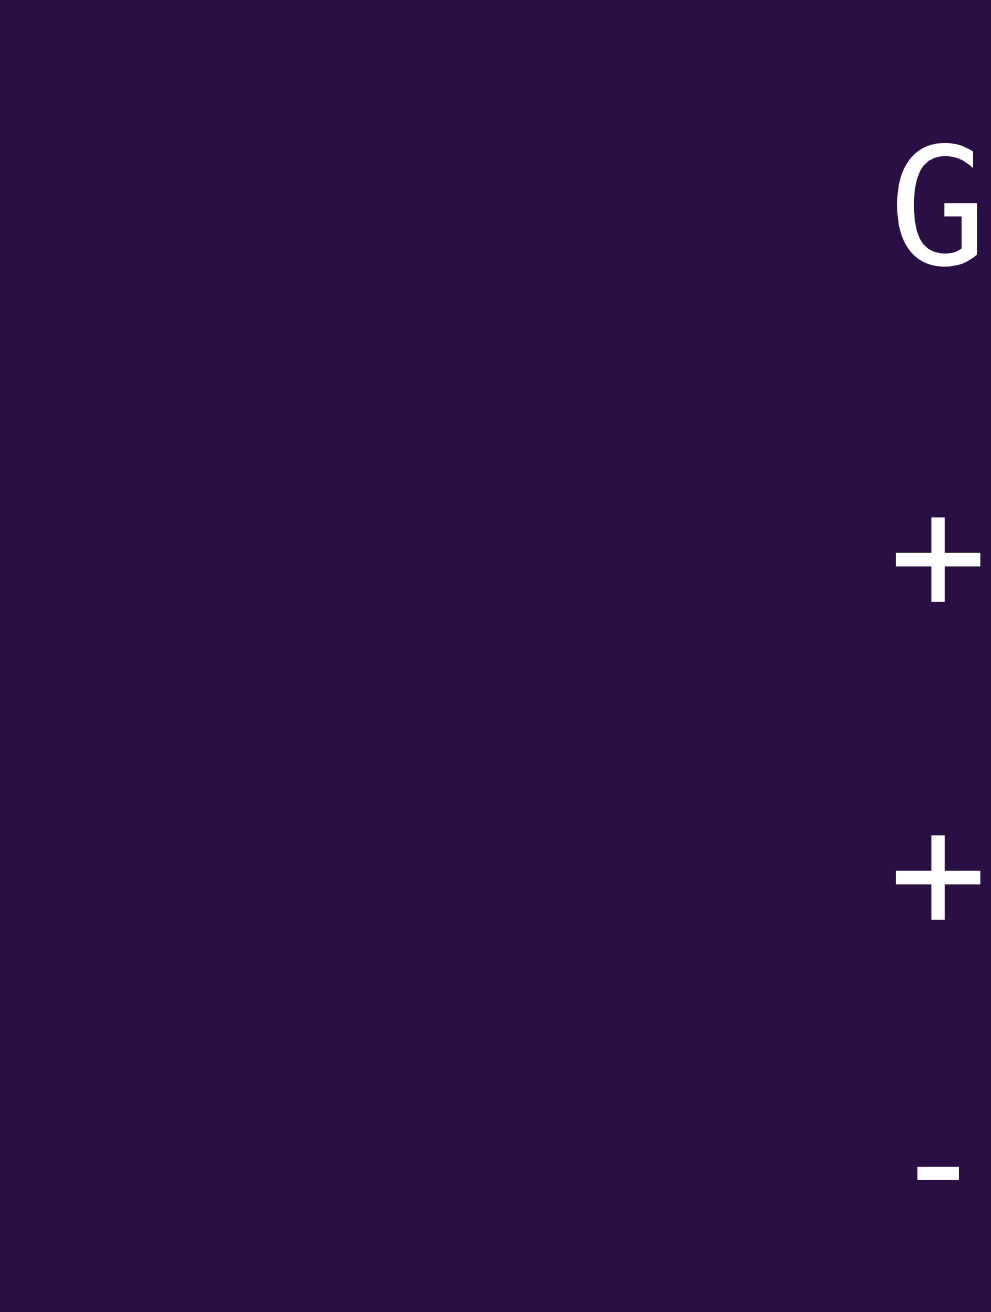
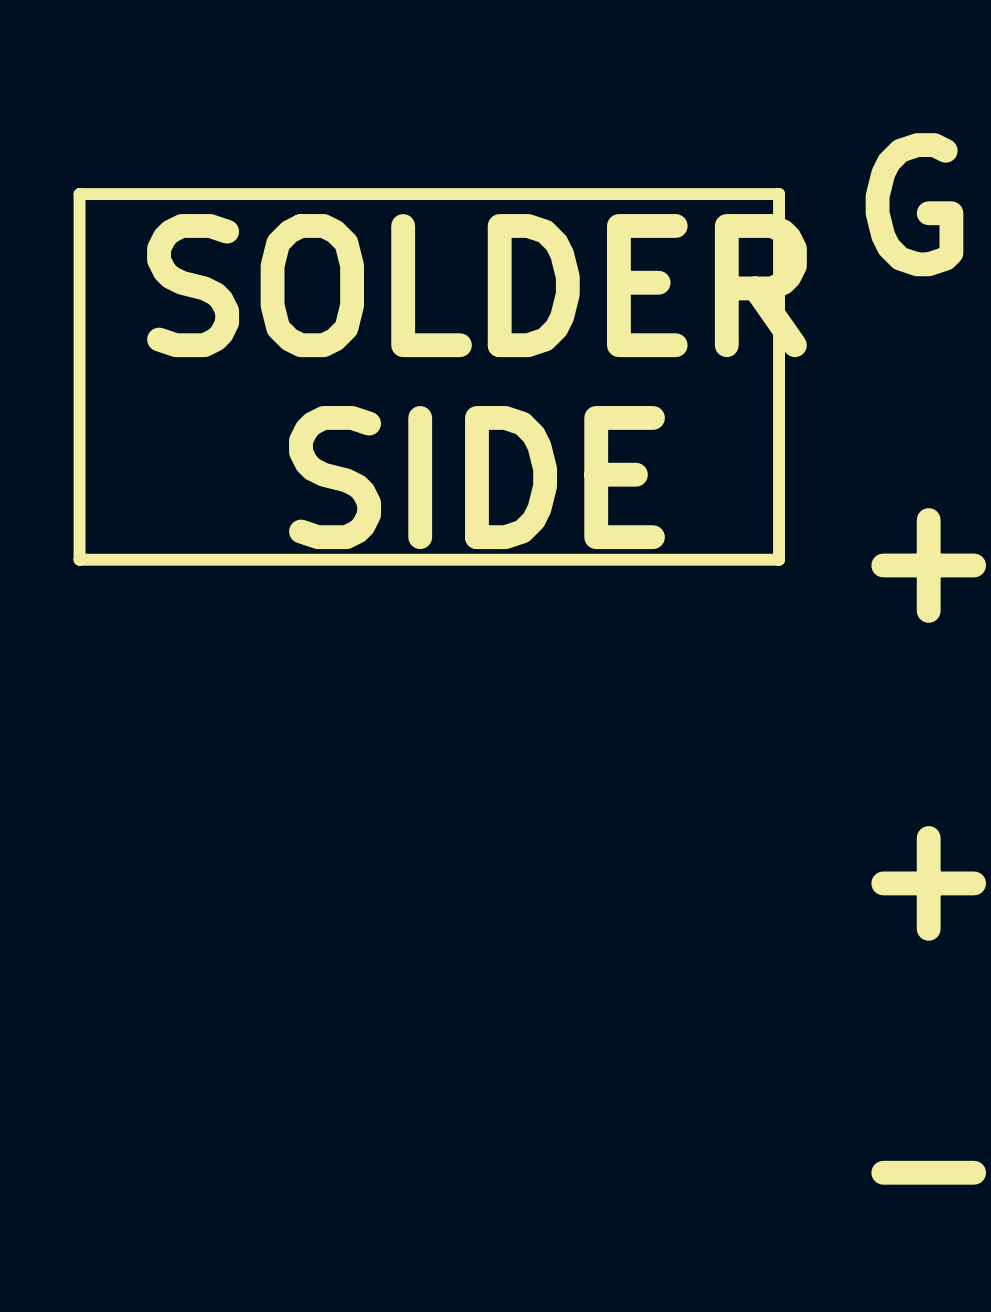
line: none -> (779, 194) (79, 194) (79, 559) (779, 559) (779, 194)
text: none -> SOLDER (476, 285)
text: none -> SIDE (476, 477)

